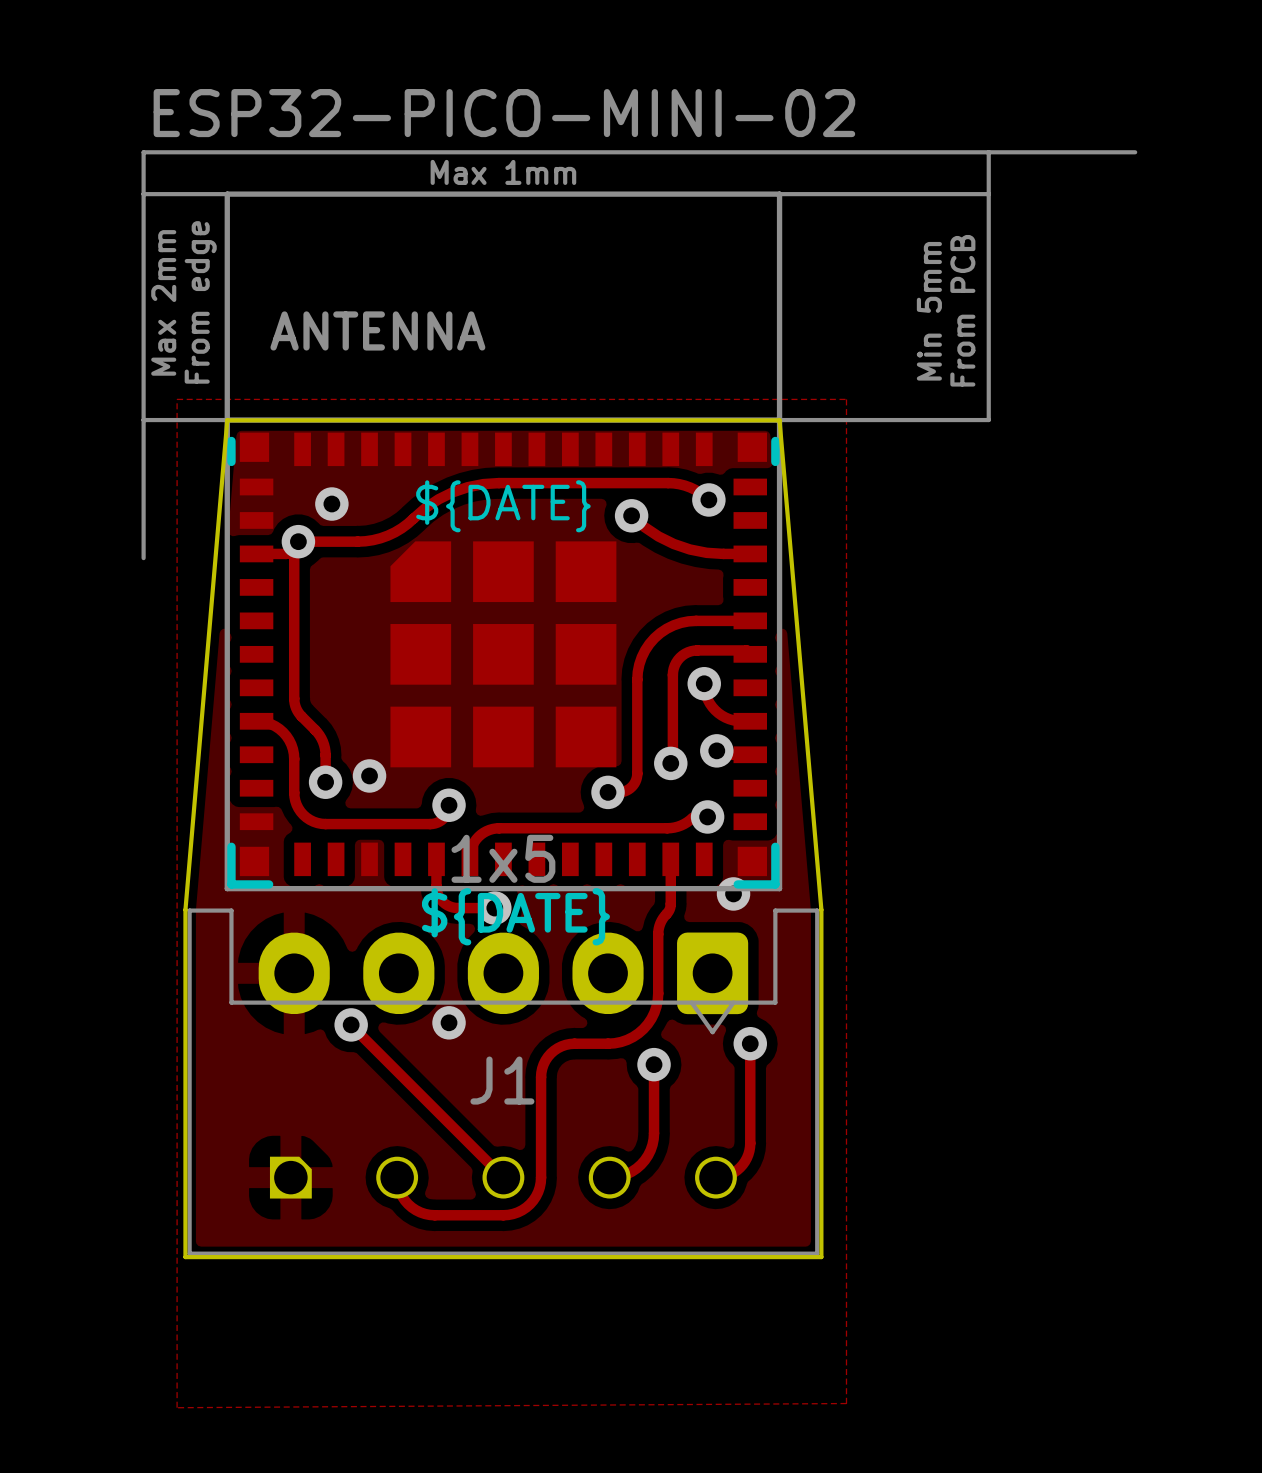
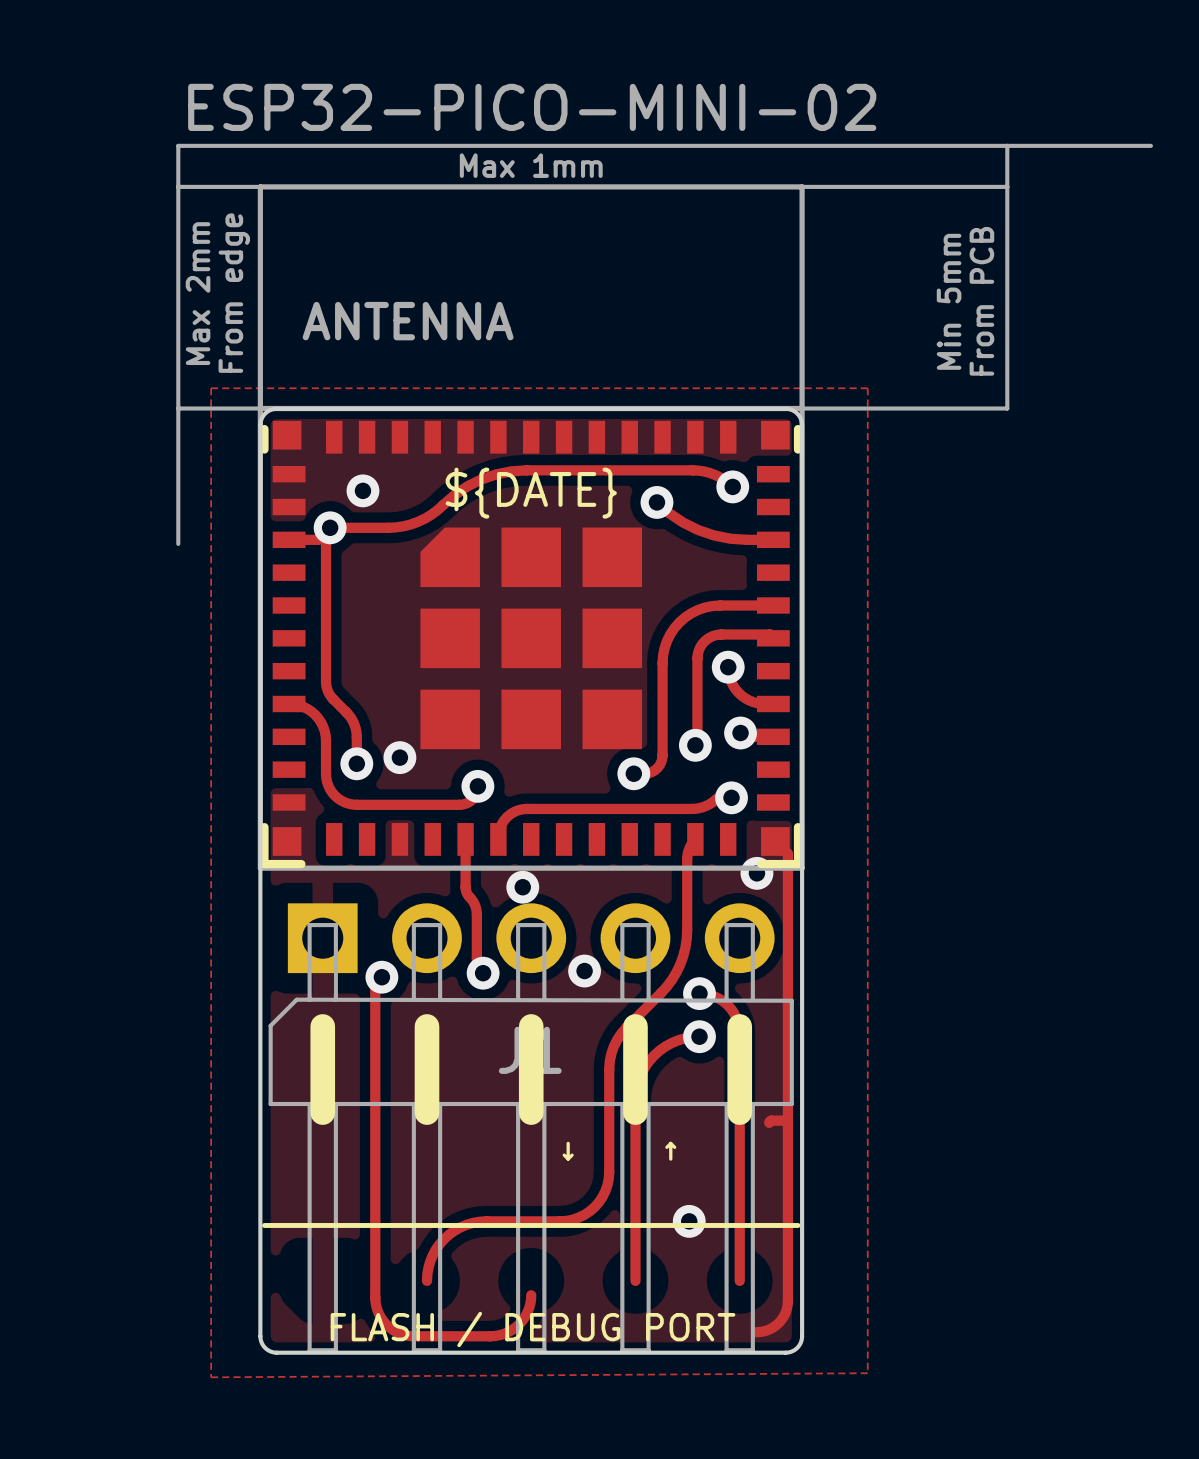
board edge: (244, 420) (227, 420) (185, 909) (185, 1257) (821, 1257) (821, 909) (779, 420) (762, 420) -> (276, 408) (265, 413) (260, 425) (260, 1336) (265, 1347) (276, 1352) (785, 1352) (794, 1350) (800, 1343) (802, 1336) (802, 425) (797, 413) (785, 408)
J1 value: 1x5 (503, 858) -> none
track: (670, 859) (670, 905) (658, 928) (658, 993) (654, 1012) (643, 1029) (627, 1039) (614, 1043) (565, 1044) (554, 1050) (545, 1060) (541, 1077) (540, 1182) (533, 1200) (522, 1210) (508, 1214) (429, 1214) (420, 1212) (408, 1204) (400, 1192) (397, 1177) -> (695, 839) (690, 846) (687, 856) (686, 938) (680, 964) (666, 986) (621, 1033) (611, 1054) (609, 1069) (609, 1172) (607, 1184) (602, 1196) (589, 1211) (572, 1219) (479, 1221) (460, 1227) (444, 1238) (436, 1249) (430, 1261) (426, 1280)
track: none -> (775, 841) (787, 854) (787, 1300) (784, 1314) (778, 1323) (766, 1330) (756, 1332)
track: (436, 886) (439, 897) (449, 906) (494, 908) -> (465, 866) (465, 889) (476, 911) (477, 962) (483, 973)
J1 footprint: [187, 908, 820, 1256] -> [268, 903, 794, 1353]
text: ${DATE} (515, 916) -> none
via: none -> (584, 971)
track: none -> (381, 977) (377, 979) (375, 983) (375, 1297) (379, 1314) (389, 1327) (405, 1335) (494, 1336) (508, 1332) (522, 1320) (528, 1308) (531, 1295)
track: none -> (699, 993) (716, 997) (727, 1005) (735, 1016) (739, 1029) (739, 1280)
via: none -> (699, 993)
via position: (449, 1022) -> (483, 973)
track: (351, 1024) (503, 1177) -> none
via position: (351, 1024) -> (381, 977)
track: (750, 1043) (749, 1150) (745, 1161) (737, 1170) (727, 1175) (715, 1177) -> none
via: (750, 1043) -> none
line: none -> (322, 1026) (322, 1112)
line: none -> (426, 1026) (426, 1112)
line: none -> (531, 1026) (531, 1112)
line: none -> (635, 1026) (635, 1112)
line: none -> (739, 1026) (739, 1112)
track: none -> (699, 1036) (678, 1040) (659, 1050) (645, 1066) (637, 1086) (635, 1280)
track: (654, 1064) (654, 1133) (650, 1150) (644, 1160) (636, 1168) (621, 1176) (609, 1177) -> none
via position: (654, 1064) -> (699, 1036)
track: none -> (787, 1120) (771, 1120) (769, 1122)
part: (503, 1177) -> none
text: none -> ↓ (568, 1151)
text: none -> ↑ (670, 1151)
via: none -> (689, 1221)
line: none -> (264, 1225) (797, 1225)
text: none -> FLASH / DEBUG PORT (532, 1329)

